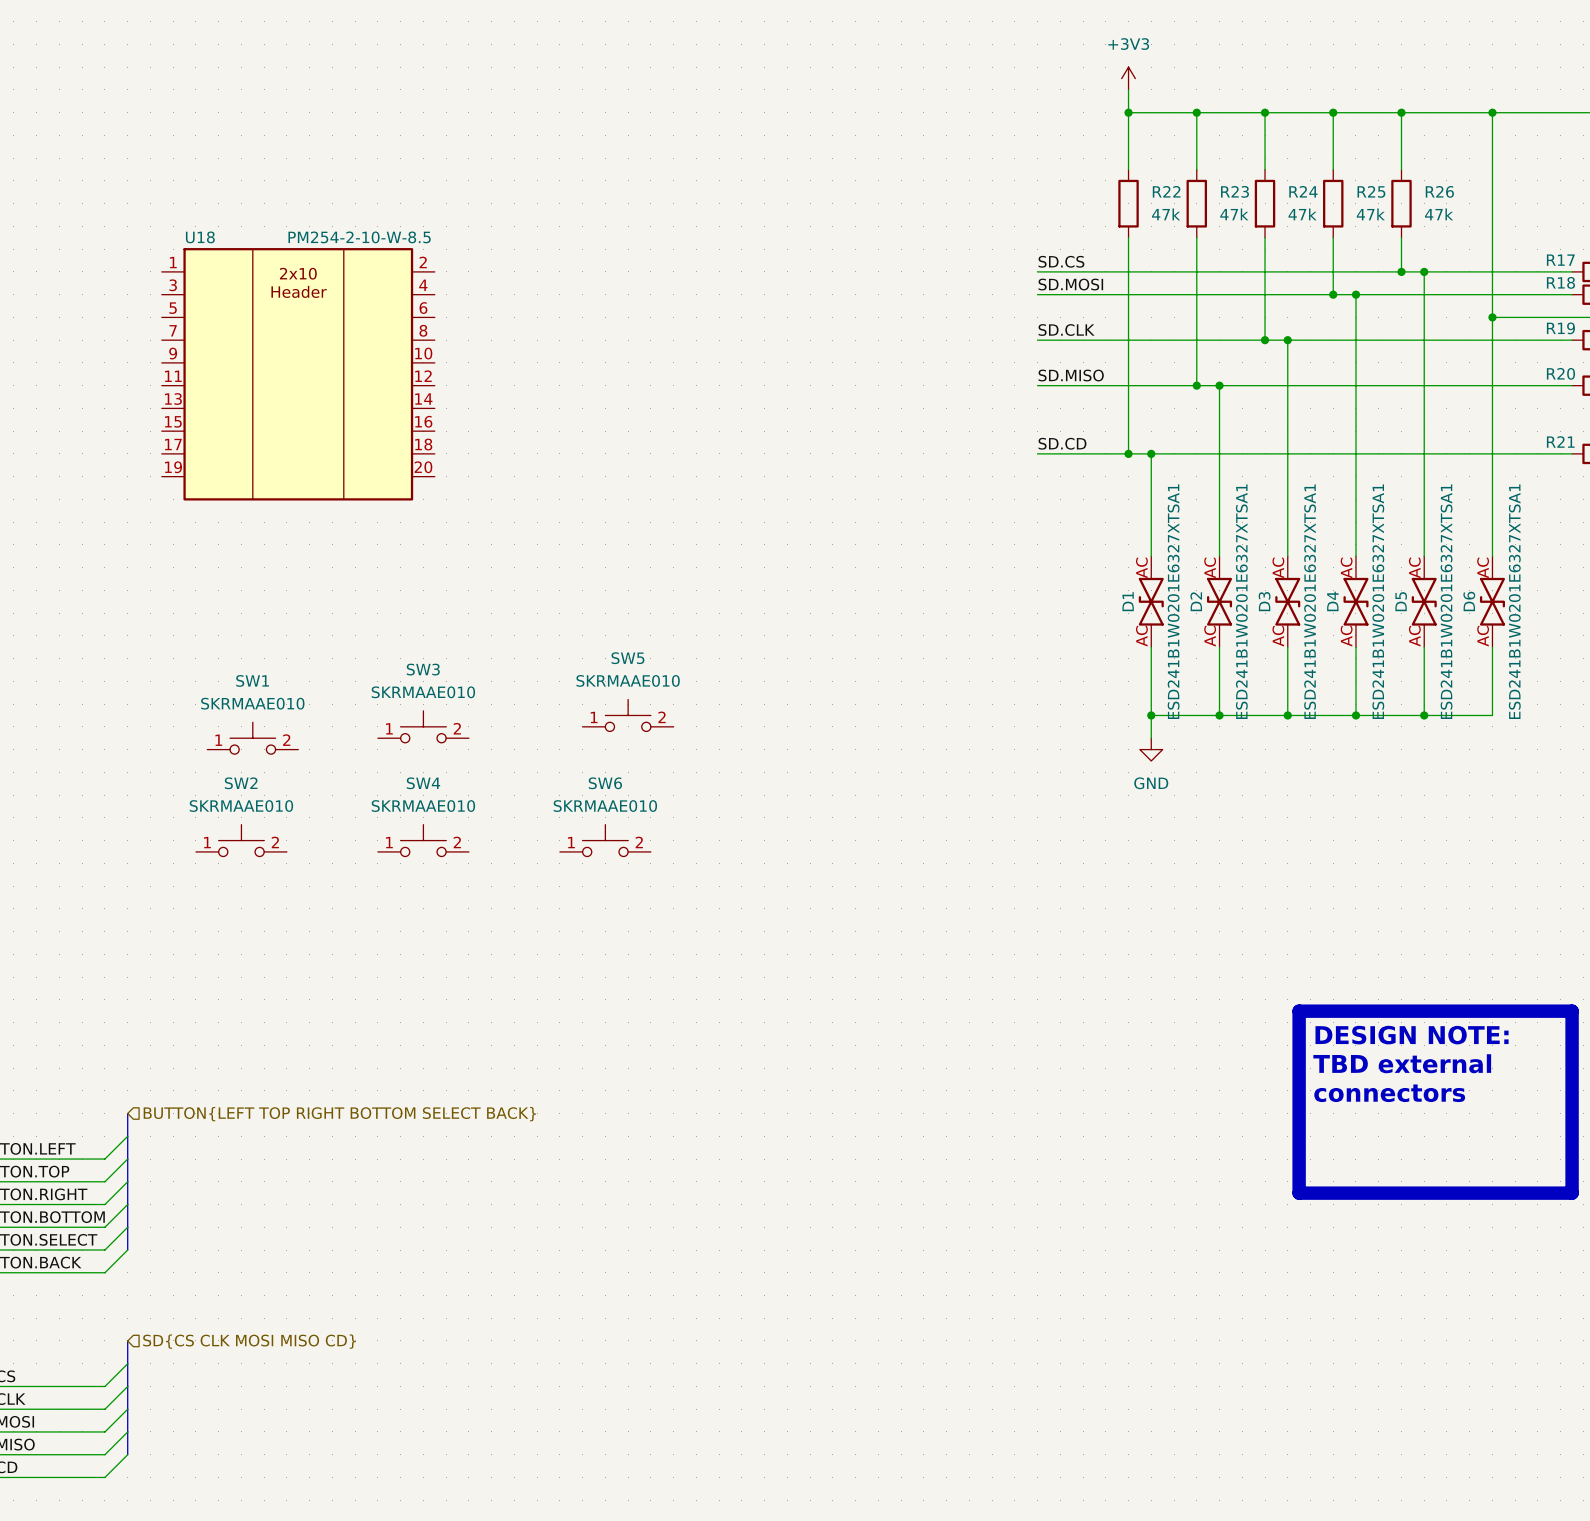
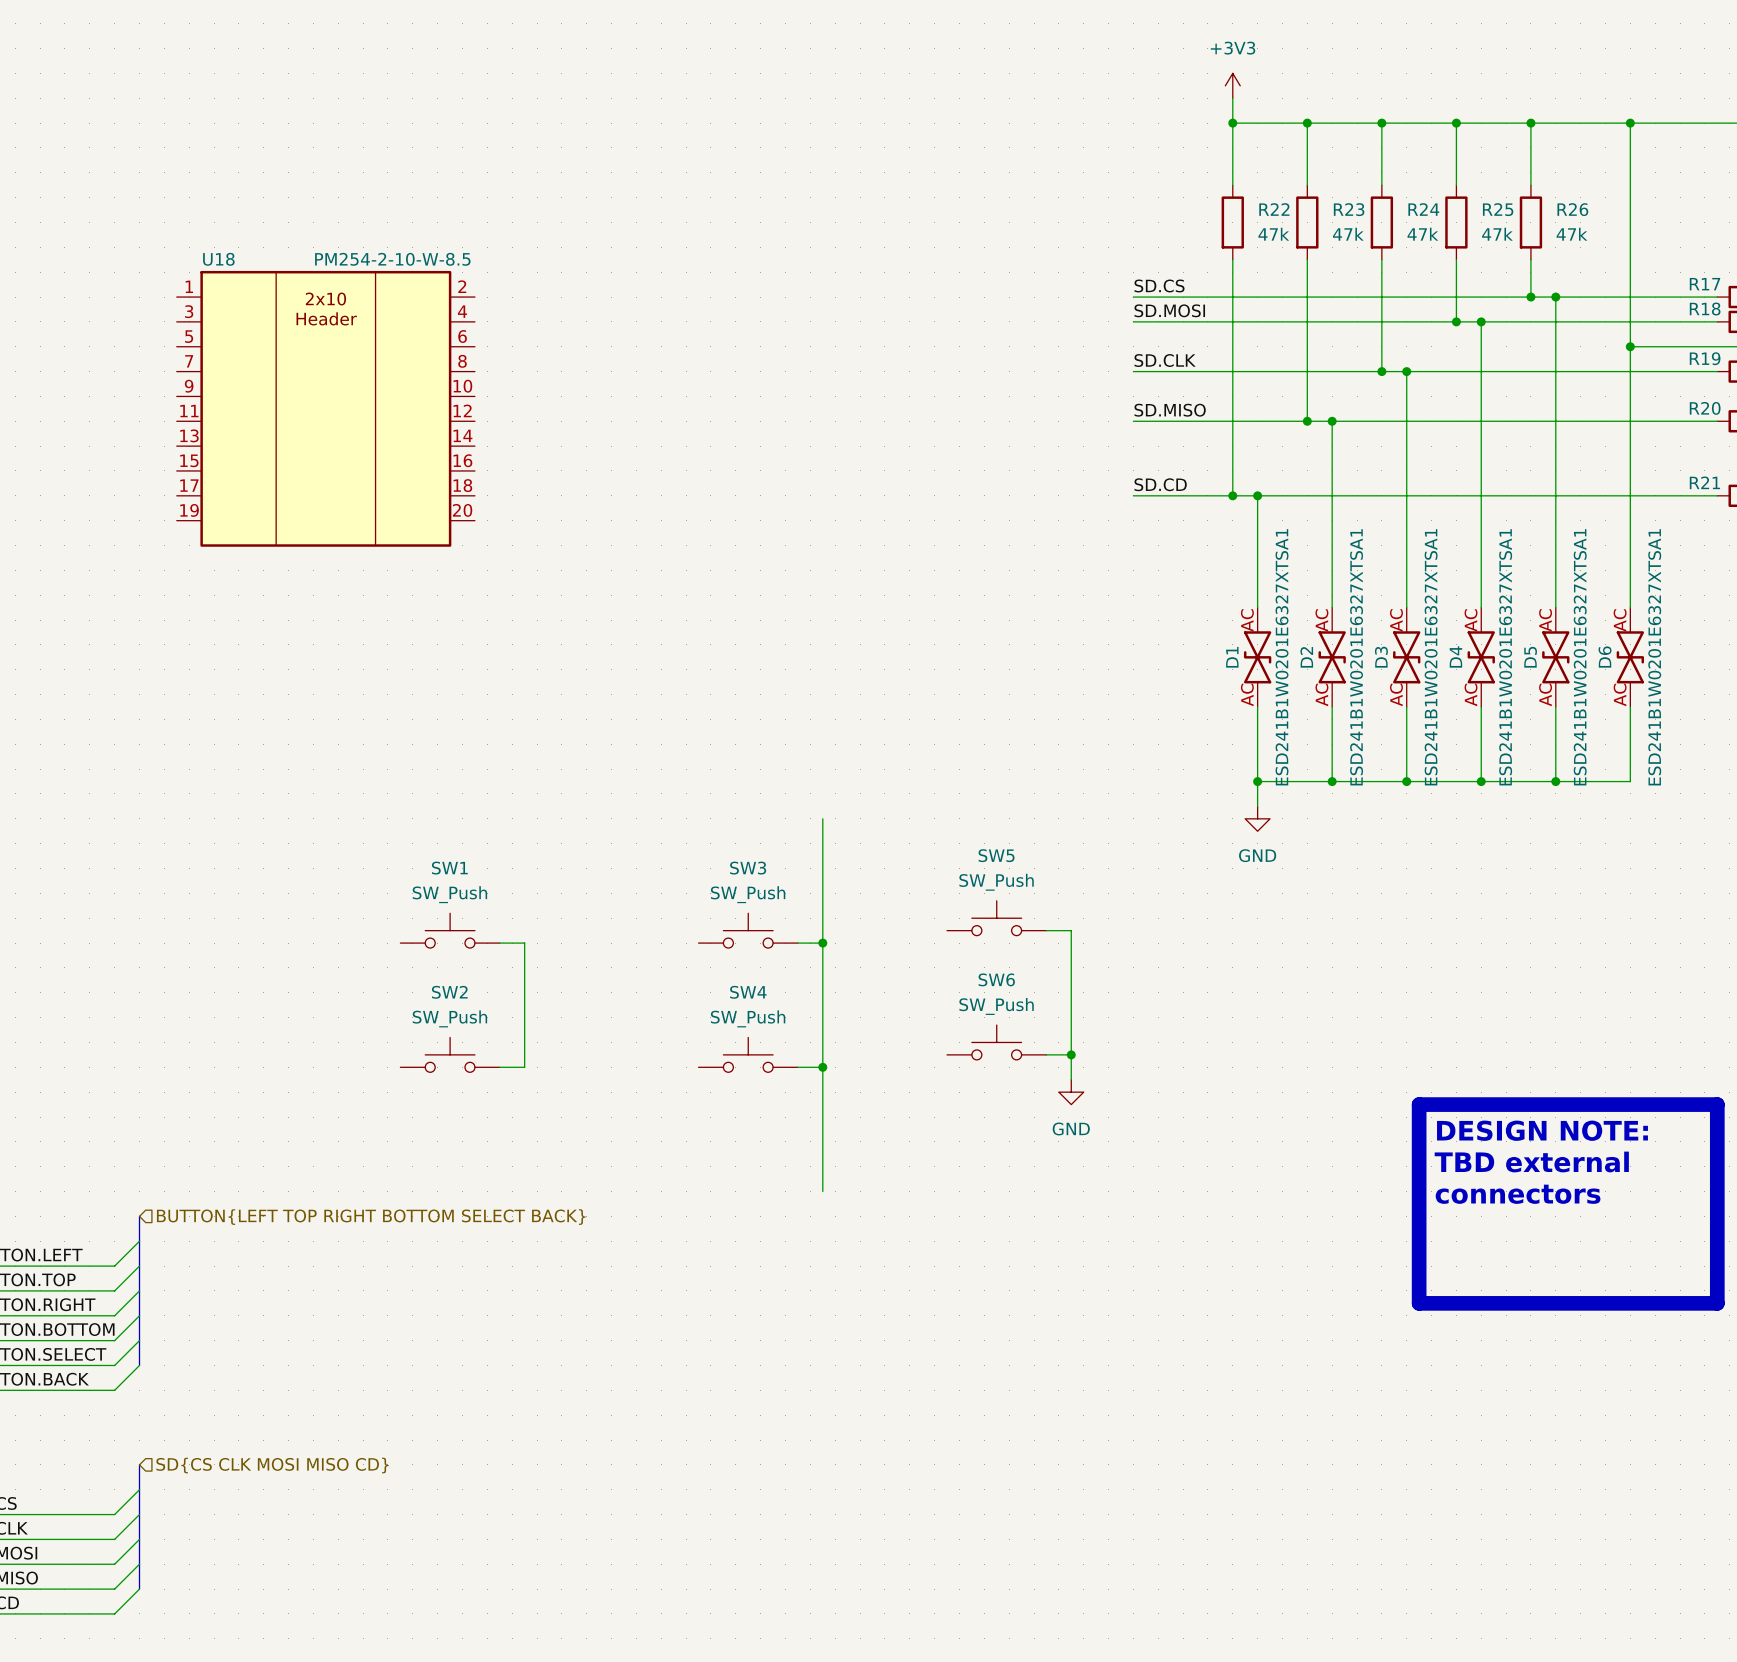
SW5 value: SKRMAAE010 (628, 680) -> SW_Push (996, 882)
SW3 value: SKRMAAE010 (423, 692) -> SW_Push (748, 894)
SW1 value: SKRMAAE010 (252, 703) -> SW_Push (449, 894)
SW5 position: (628, 715) -> (996, 918)
SW5 pin number: 1 (594, 717) -> none
SW5 pin number: 2 (662, 717) -> none
SW3 position: (423, 726) -> (748, 930)
SW3 pin number: 1 (389, 728) -> none
SW3 pin number: 2 (457, 728) -> none
SW1 position: (252, 738) -> (450, 930)
SW1 pin number: 1 (218, 740) -> none
SW1 pin number: 2 (286, 740) -> none
wire: none -> (822, 818) (822, 1191)
SW2 value: SKRMAAE010 (241, 806) -> SW_Push (449, 1018)
SW4 value: SKRMAAE010 (423, 806) -> SW_Push (748, 1018)
SW6 value: SKRMAAE010 (605, 806) -> SW_Push (996, 1006)
SW2 position: (241, 840) -> (450, 1054)
SW4 position: (423, 840) -> (748, 1054)
SW6 position: (605, 840) -> (996, 1042)
SW2 pin number: 1 (207, 842) -> none
SW2 pin number: 2 (275, 842) -> none
SW4 pin number: 1 (389, 842) -> none
SW4 pin number: 2 (457, 842) -> none
SW6 pin number: 1 (571, 842) -> none
SW6 pin number: 2 (639, 842) -> none
wire: none -> (1046, 930) (1071, 930) (1071, 1079)
wire: none -> (499, 943) (524, 943) (524, 1067) (499, 1067)
wire: none -> (797, 943) (822, 943)
junction: none -> (822, 943)
wire: none -> (1046, 1054) (1071, 1054)
junction: none -> (1071, 1054)
wire: none -> (797, 1067) (822, 1067)
junction: none -> (822, 1067)
power symbol: none -> GND (1071, 1092)

